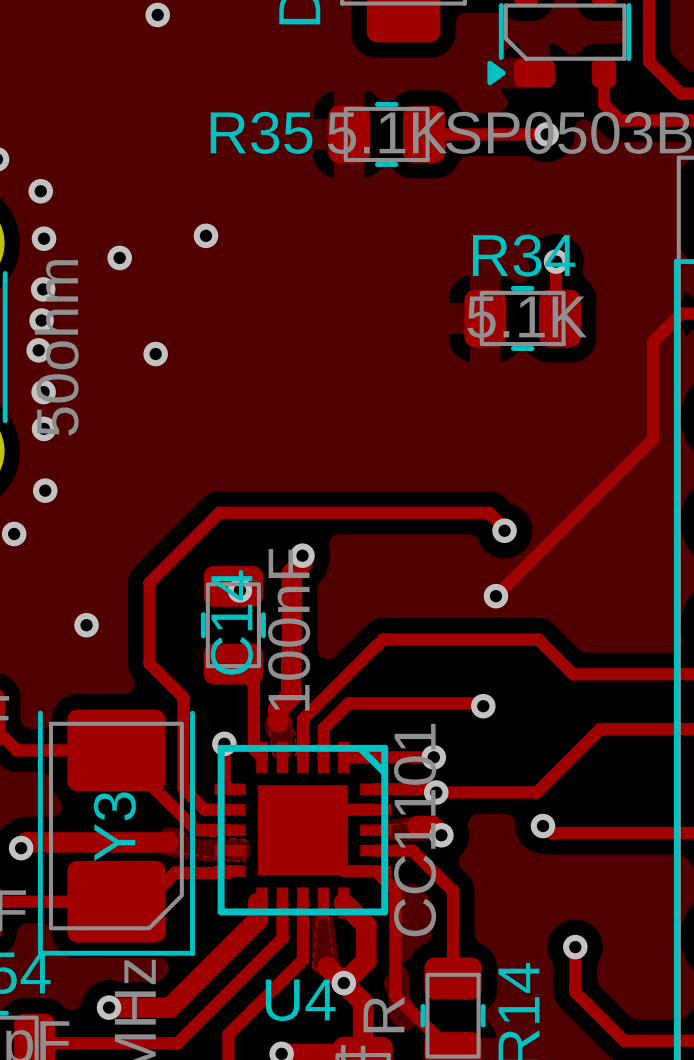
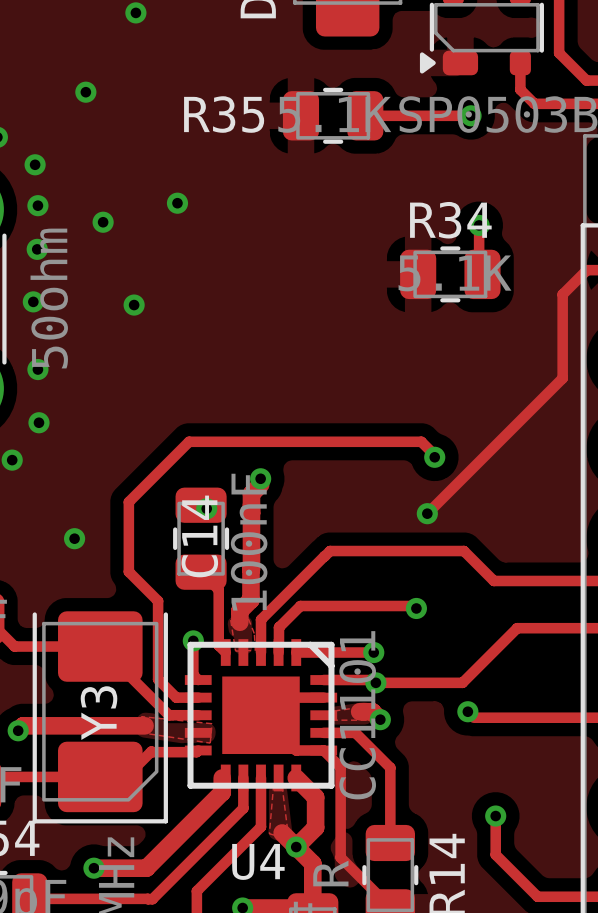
via: none -> (85, 92)
via: (41, 320) -> none
via: (43, 392) -> none

